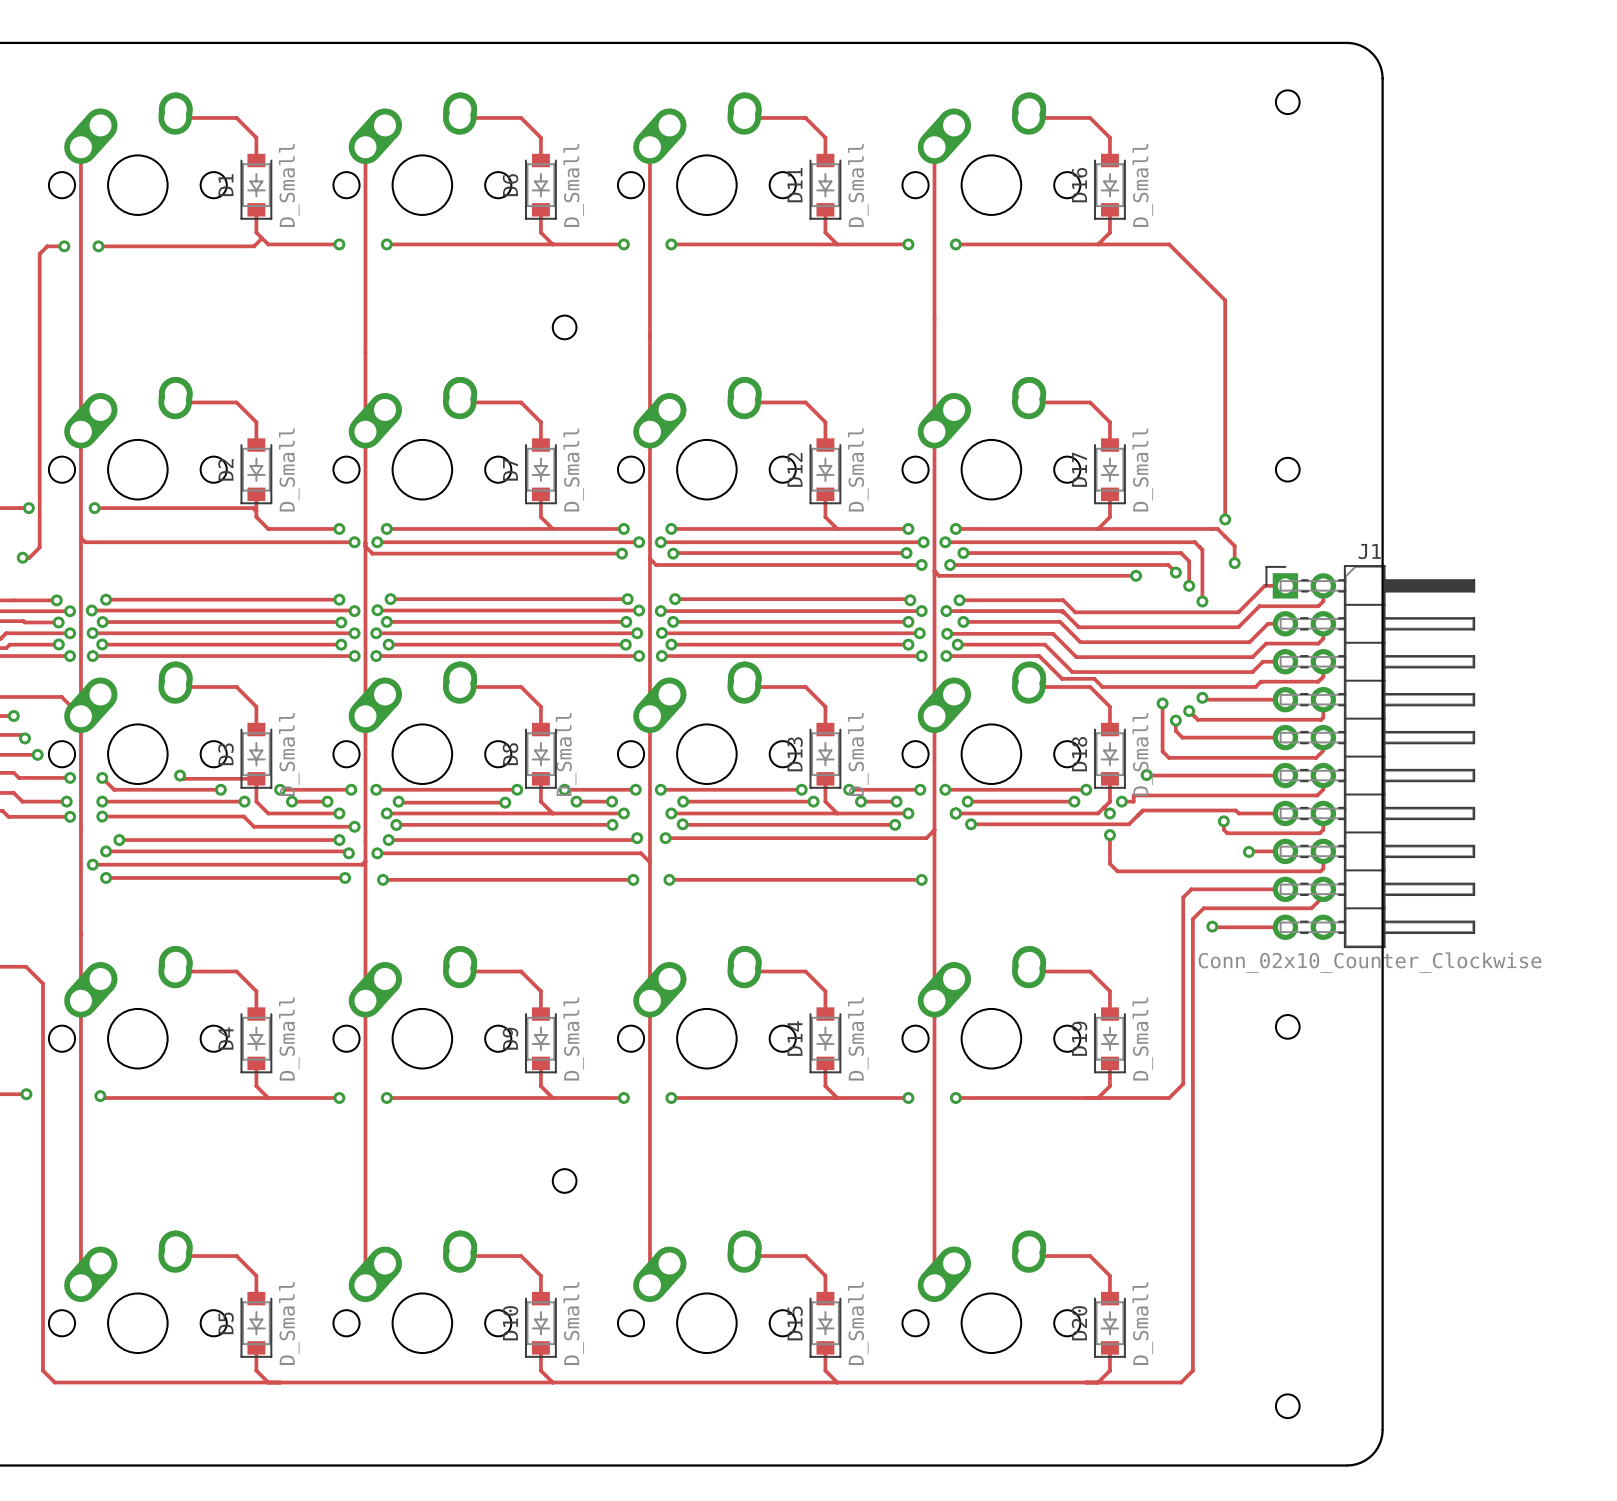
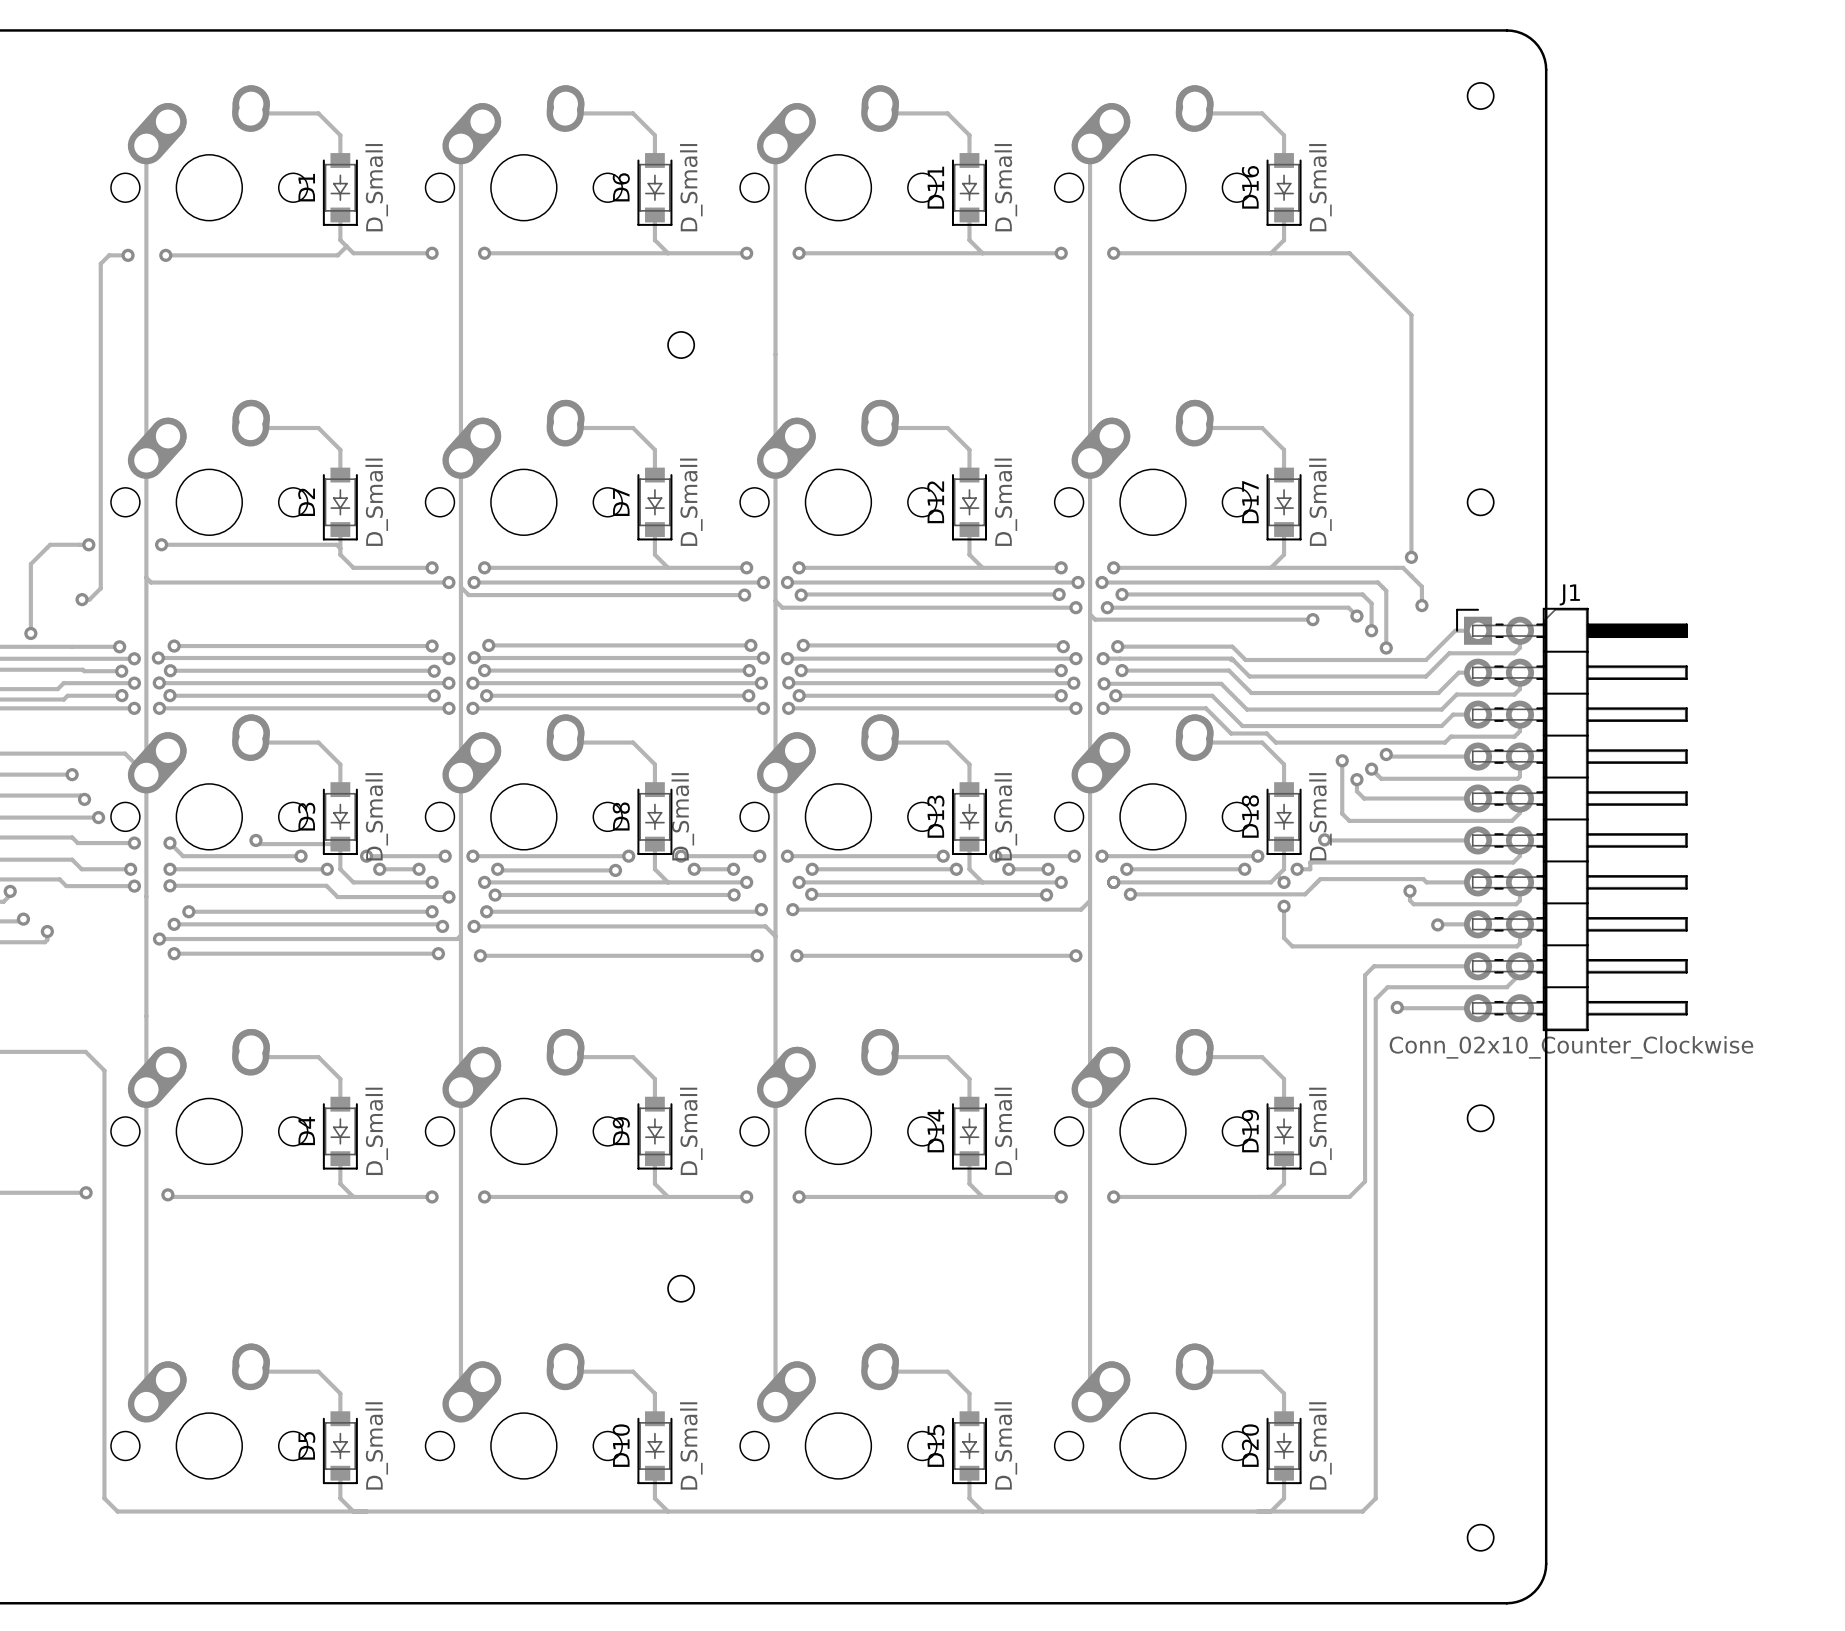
board edge: (1311, 42) (1351, 43) (1364, 47) (1377, 60) (1382, 78) (1382, 1429) (1377, 1447) (1364, 1460) (1351, 1465) (1311, 1465) -> (1506, 30) (1521, 33) (1534, 41) (1543, 54) (1546, 69) (1546, 1563) (1543, 1578) (1534, 1591) (1521, 1600) (1506, 1603)

